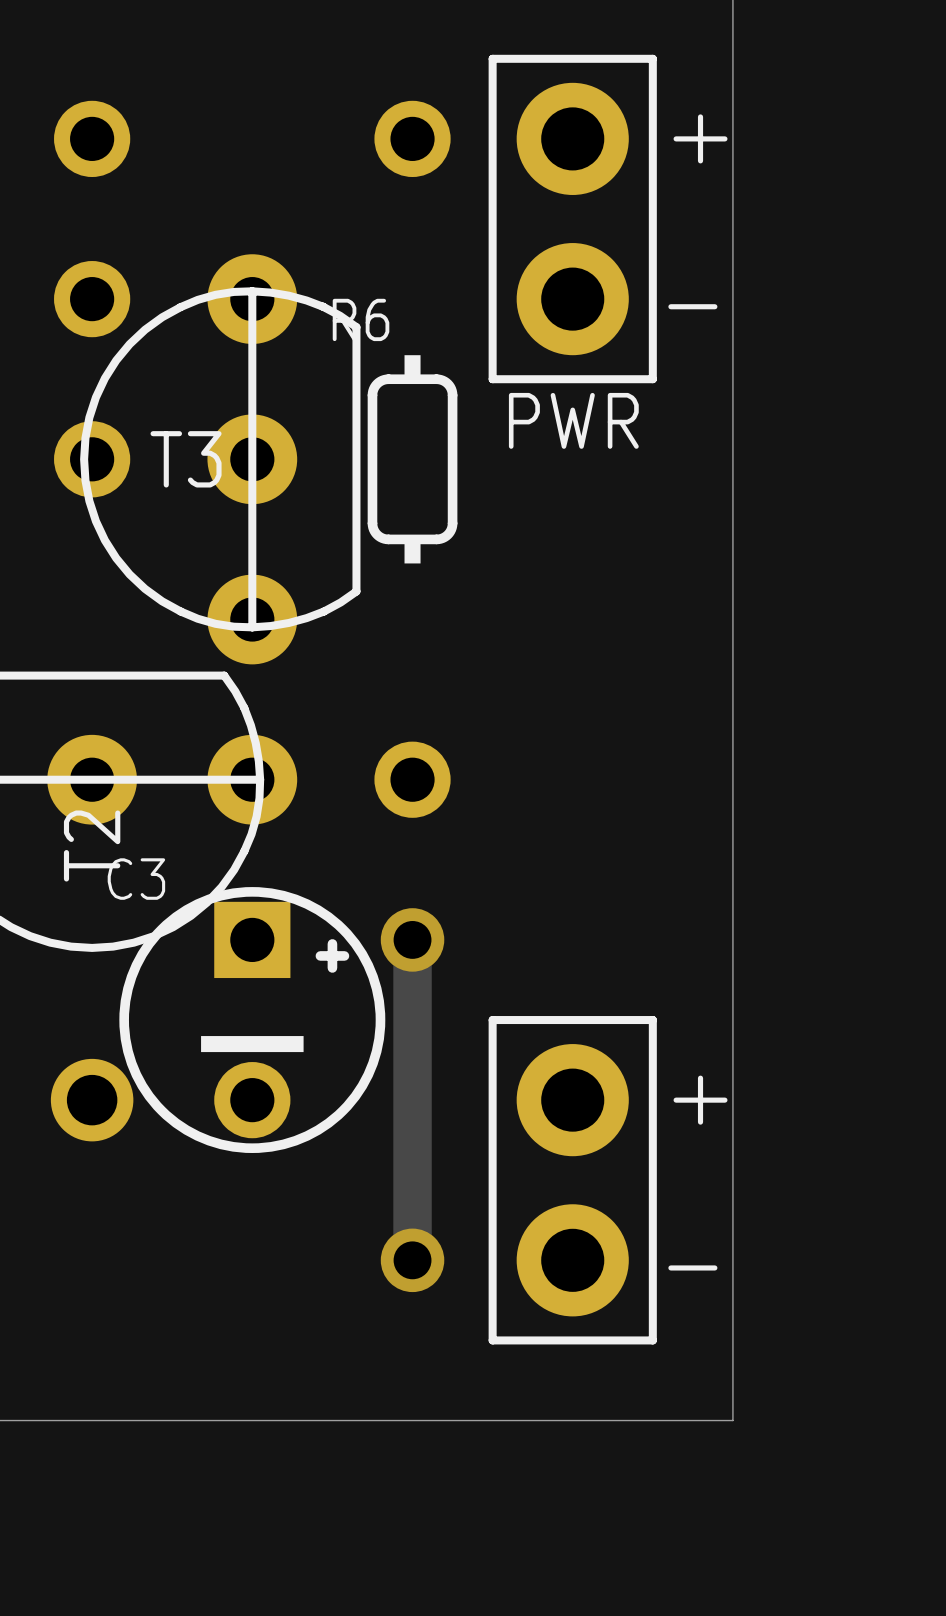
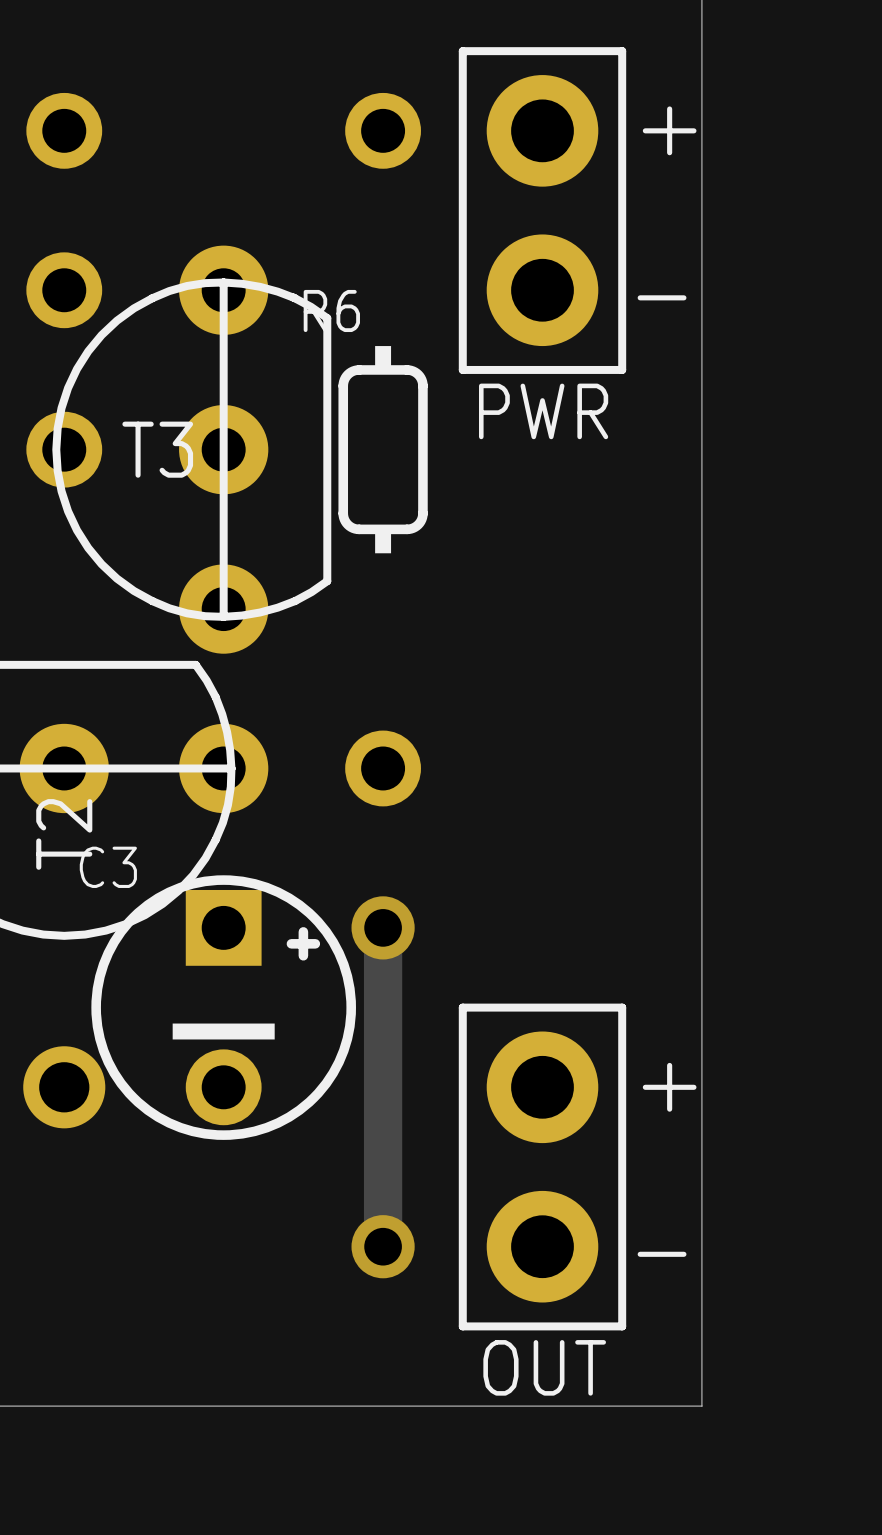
OUT name: none -> OUT (544, 1367)

